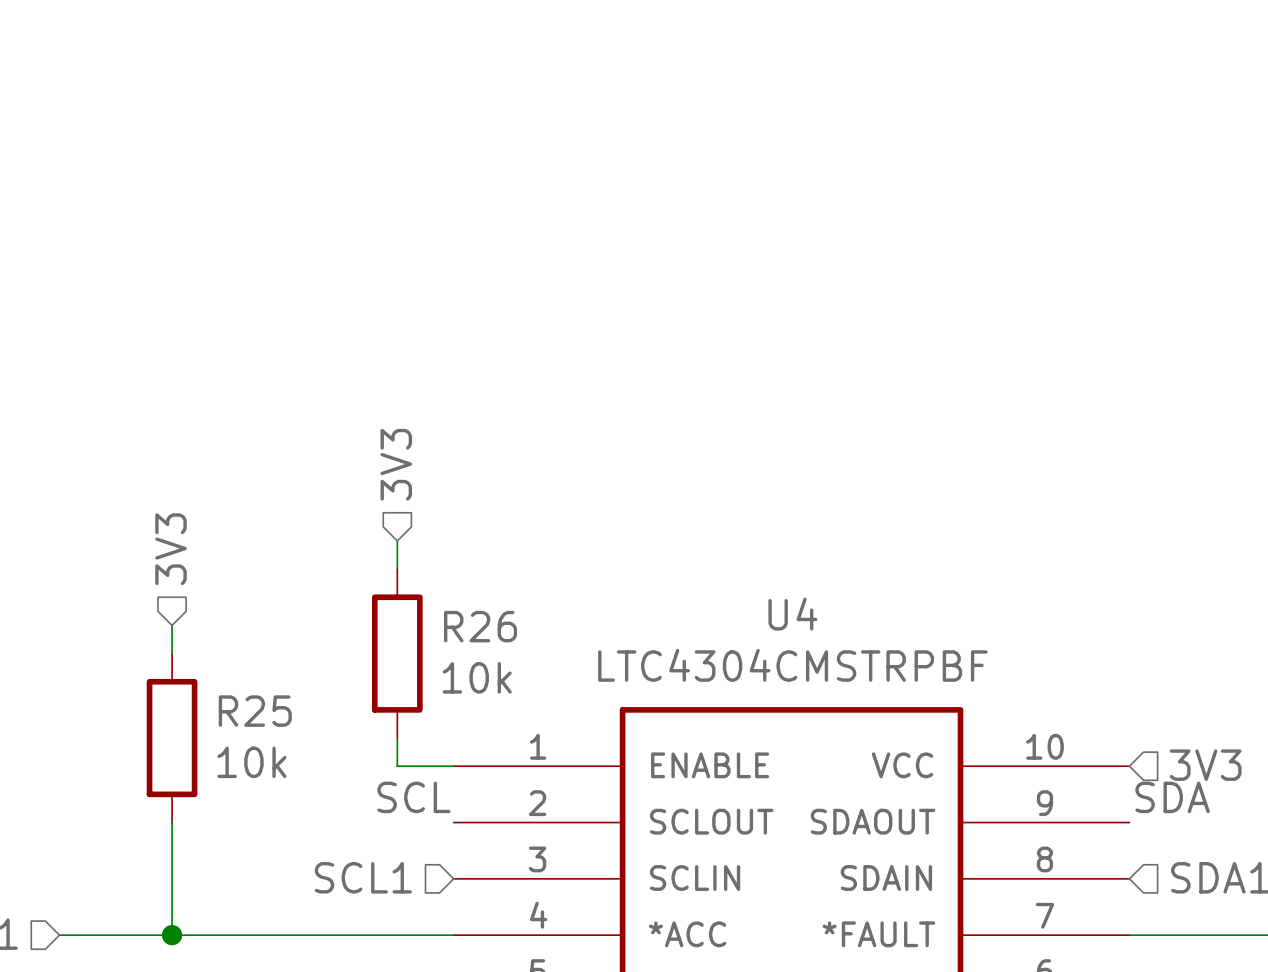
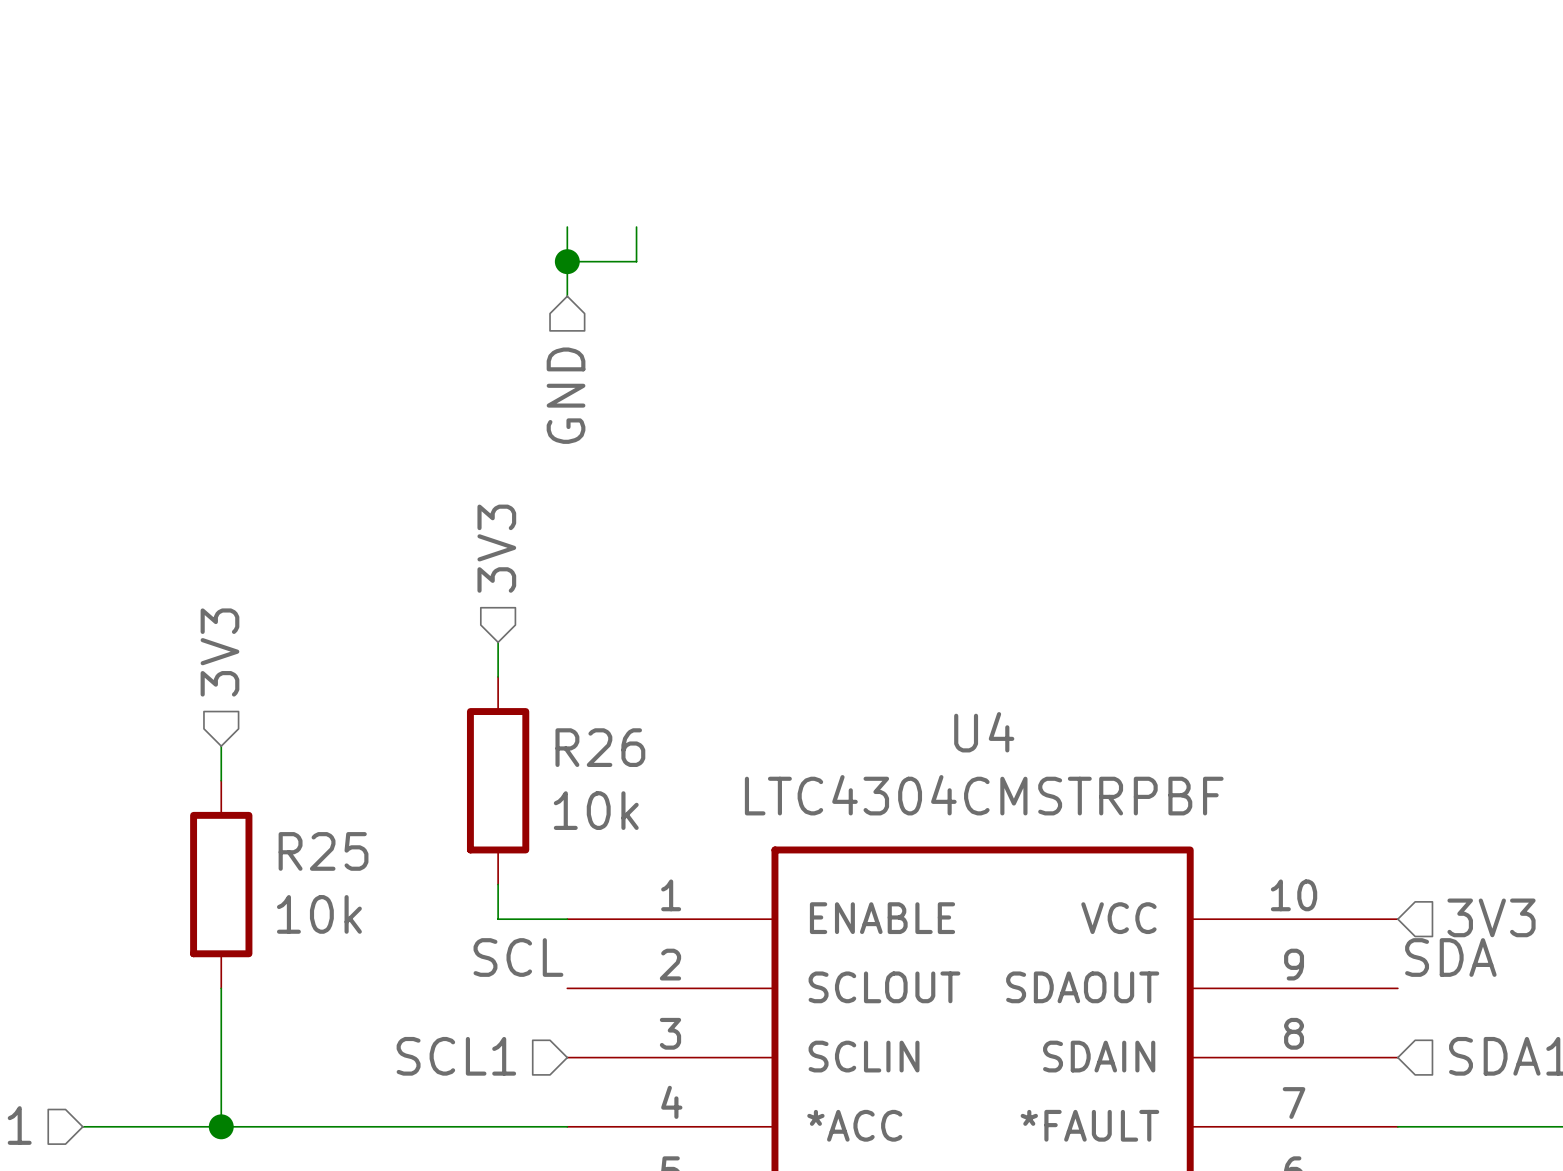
wire: none -> (567, 227) (567, 296)
wire: none -> (636, 227) (636, 261) (567, 261)
junction: none -> (567, 261)
hierarchical label: none -> GND (566, 395)

